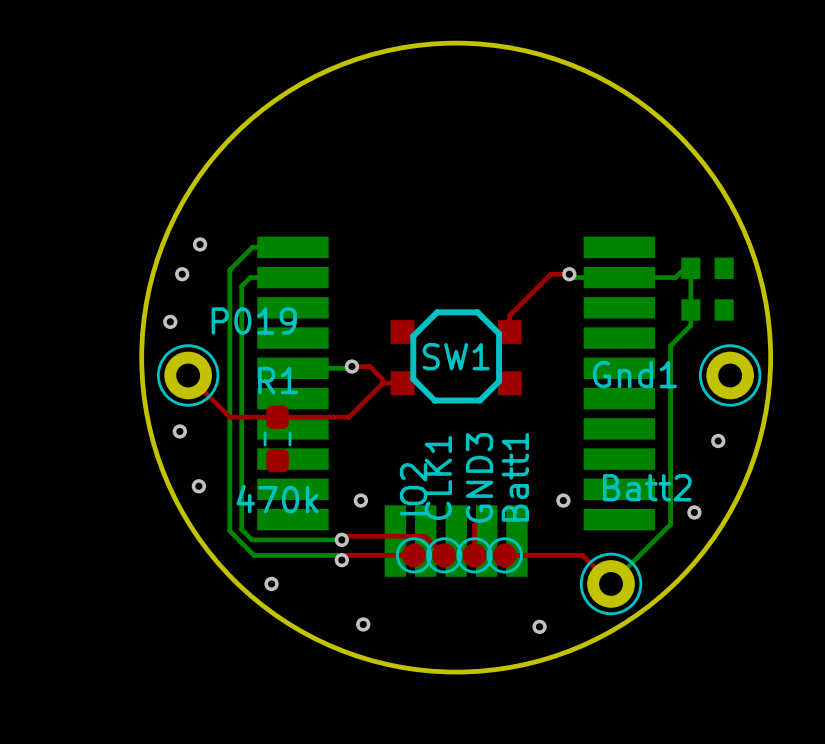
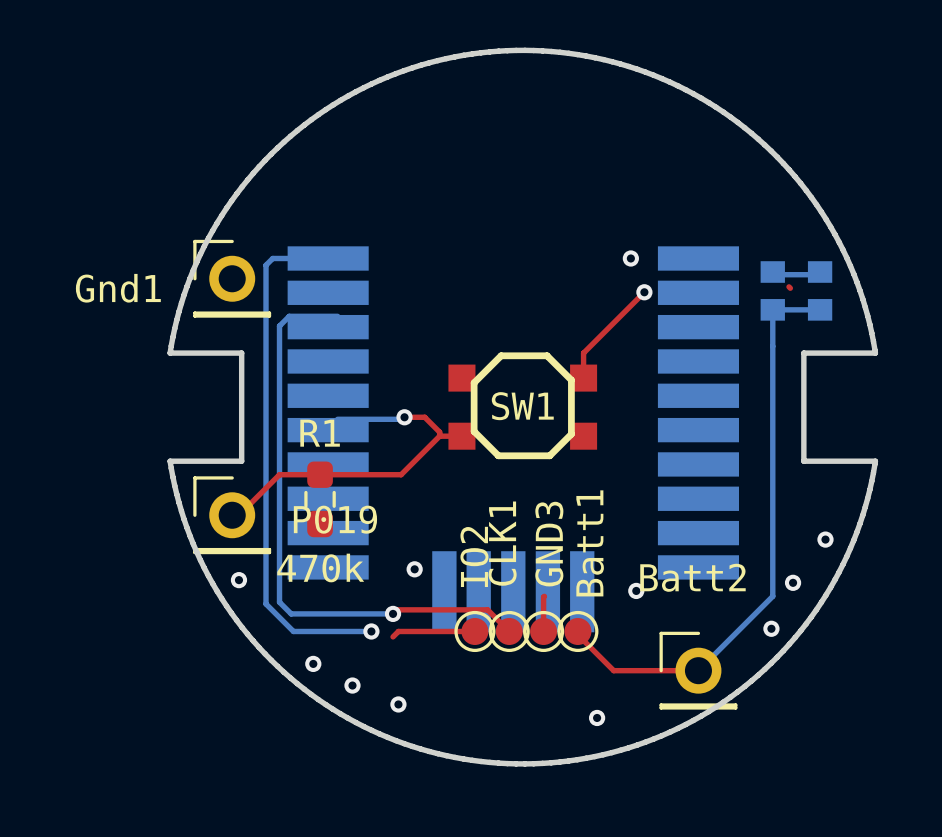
round board edge: [139, 40, 774, 675] -> none
board edge: none -> (516, 50) (472, 53) (437, 60) (404, 70) (363, 87) (333, 104) (304, 125) (277, 147) (247, 180) (217, 223) (196, 262) (181, 303) (170, 353) (241, 353) (241, 461) (170, 461) (176, 494) (187, 527) (212, 583) (247, 634) (290, 678) (340, 713) (371, 730) (404, 743) (463, 759) (524, 763) (568, 760) (603, 754) (637, 745) (677, 728) (708, 711) (744, 686) (771, 663) (795, 637) (821, 602) (846, 556) (865, 506) (875, 461) (803, 461) (803, 353) (875, 353) (860, 290) (835, 234) (816, 204) (795, 176) (751, 133) (701, 98) (669, 82) (637, 69) (577, 54) (516, 50)
via: none -> (630, 258)
bottom track: none -> (772, 274) (820, 274)
via: (200, 244) -> none
bottom track: (292, 247) (252, 247) (229, 269) -> (328, 258) (272, 258) (266, 265) (266, 307)
top track: none -> (789, 286) (790, 288)
part: none -> (772, 290)
part: none -> (820, 290)
part: (707, 268) -> none
bottom track: none -> (820, 309) (772, 309) (772, 596) (698, 670)
via: (182, 274) -> none
top track: (569, 274) (550, 274) (509, 315) -> (644, 292) (583, 353) (583, 359)
bottom track: (569, 274) (572, 277) (675, 277) (690, 262) (690, 325) (670, 345) (670, 524) (611, 583) -> none
via position: (569, 274) -> (644, 292)
part: (707, 309) -> none
P019 name position: P019 (254, 320) -> P019 (335, 519)
via: (170, 321) -> none
P019 footprint: [156, 344, 220, 407] -> [193, 476, 272, 555]
Gnd1 footprint: [698, 344, 762, 407] -> [193, 239, 272, 318]
top track: (188, 375) (229, 417) (241, 417) -> (238, 515) (279, 474)
part position: (456, 406) -> (513, 439)
via: (179, 431) -> none
via position: (718, 441) -> (825, 539)
via position: (198, 486) -> (238, 580)
via position: (563, 500) -> (636, 590)
Batt2 footprint: [579, 552, 643, 616] -> [659, 631, 738, 710]
via: none -> (771, 628)
bottom track: (322, 555) (337, 555) (341, 560) -> none
top track: none -> (574, 631) (613, 670) (698, 670)
top track: (504, 555) (582, 555) (611, 583) (599, 595) -> none
via position: (341, 560) -> (371, 631)
via: none -> (352, 685)
via position: (363, 624) -> (398, 704)
via position: (539, 626) -> (597, 717)

